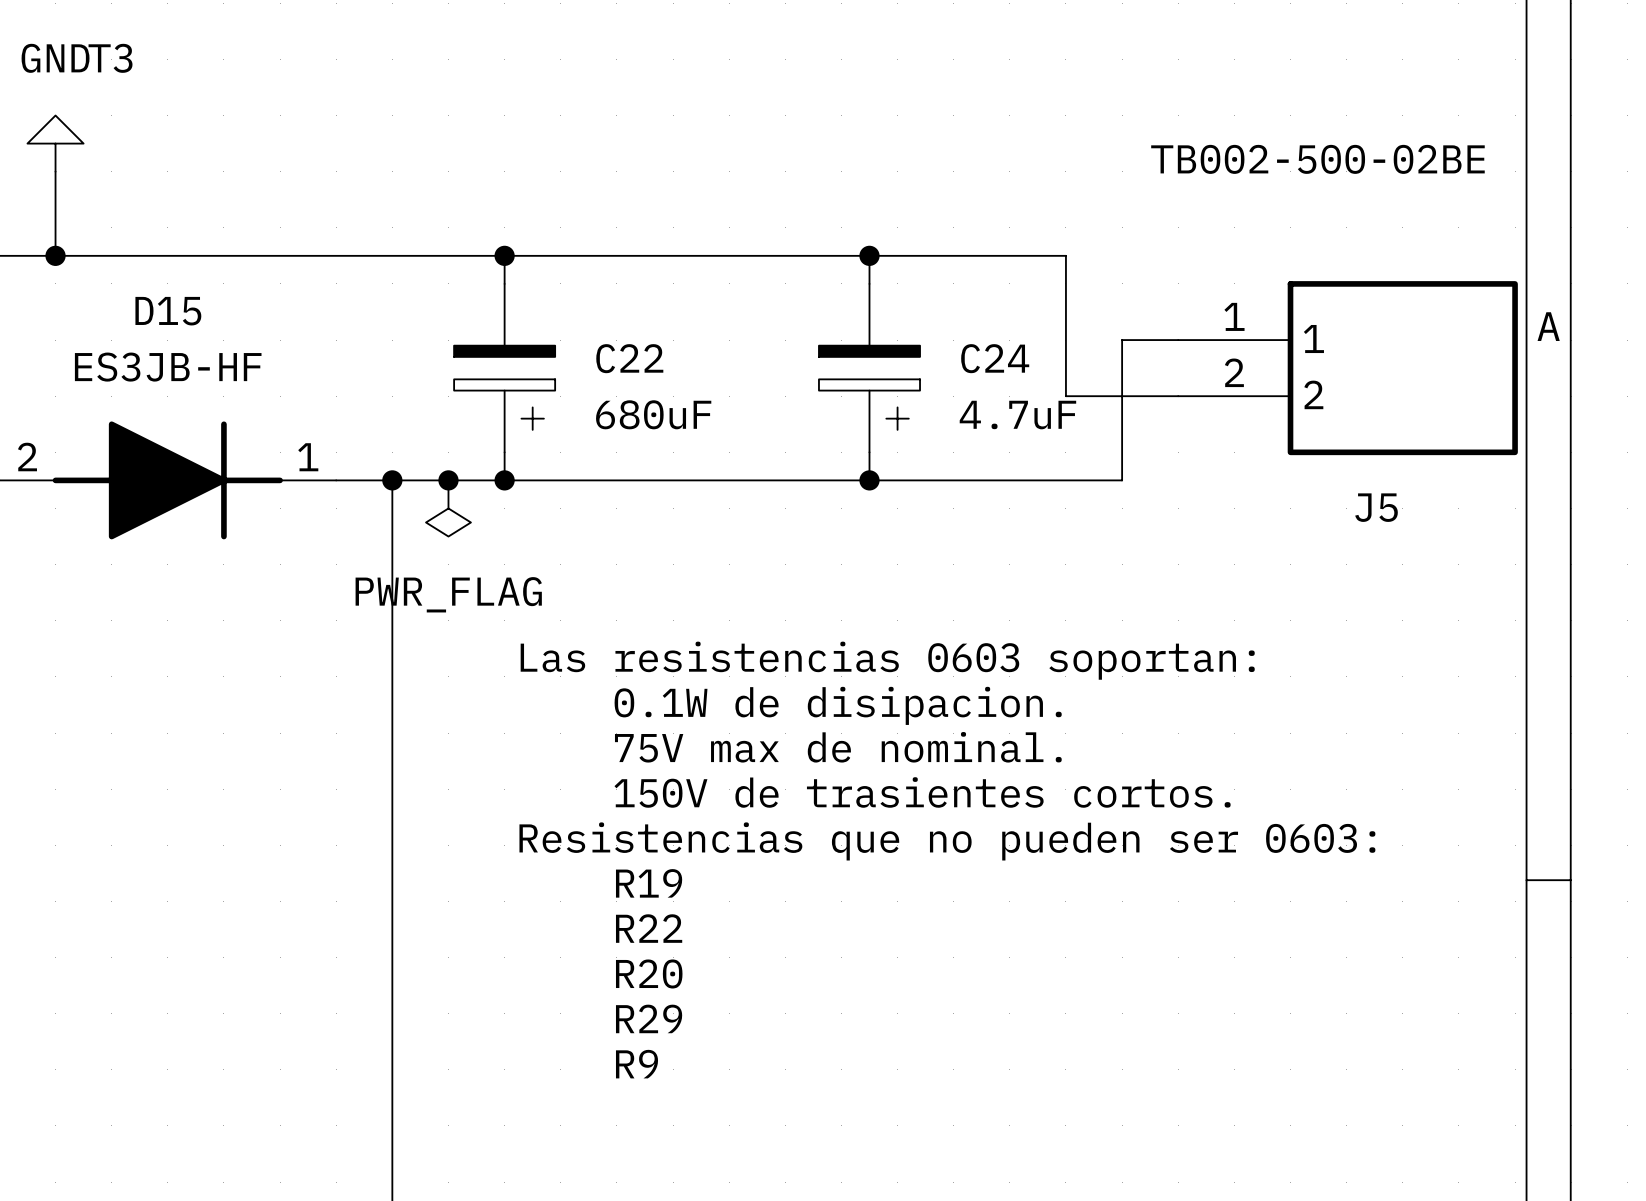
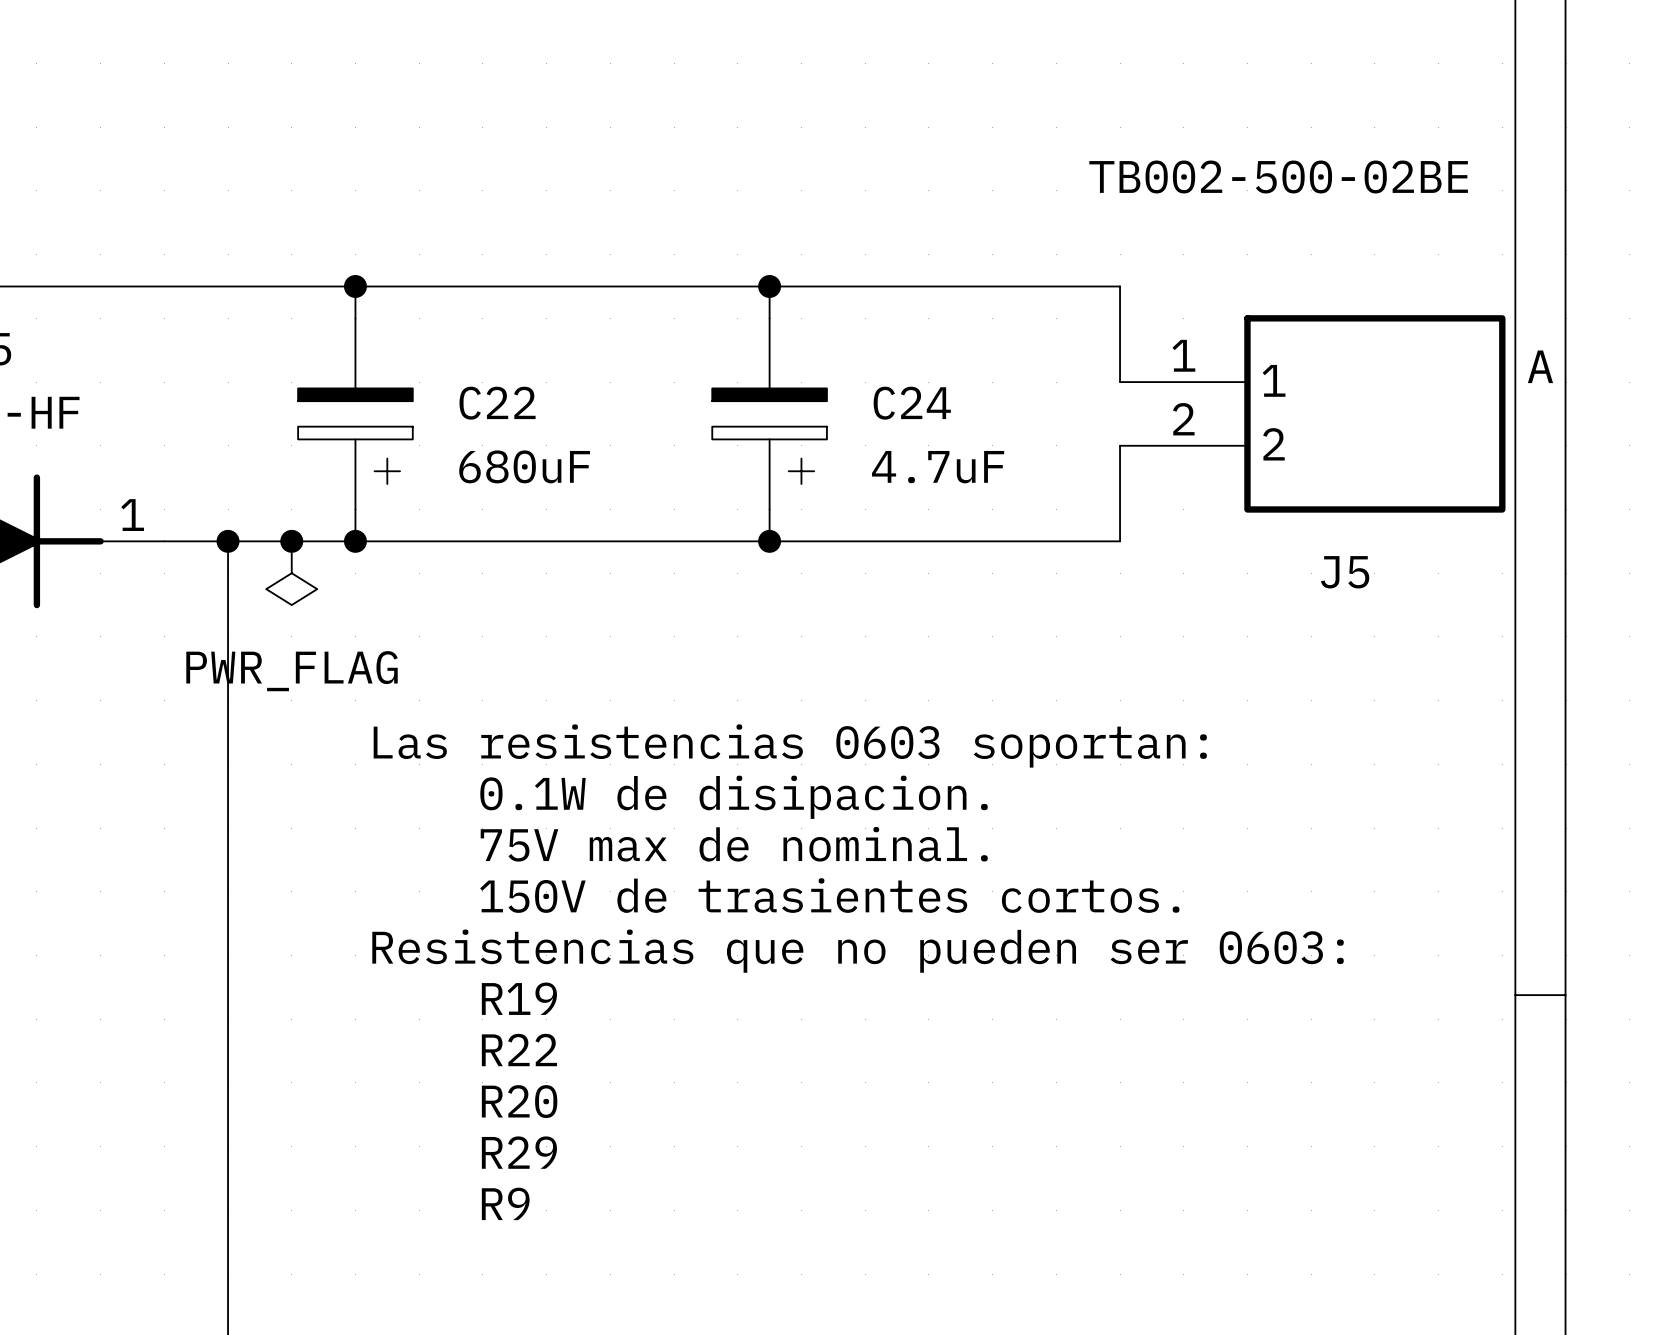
wire: (1065, 255) (1065, 396) (1178, 396) -> (992, 286) (1120, 286) (1120, 382)
wire: (1178, 340) (1122, 340) (1122, 480) -> (1120, 445) (1120, 541) (1056, 541)

